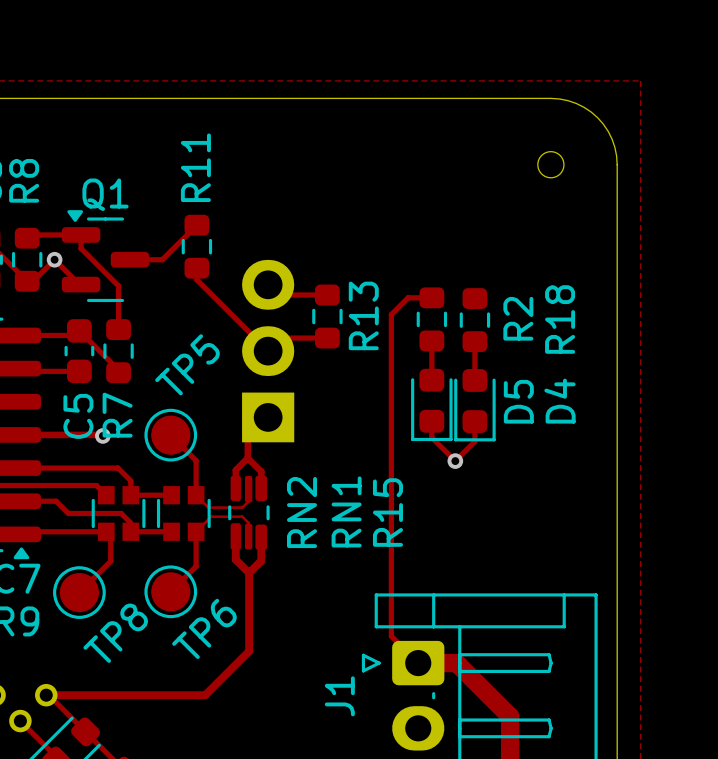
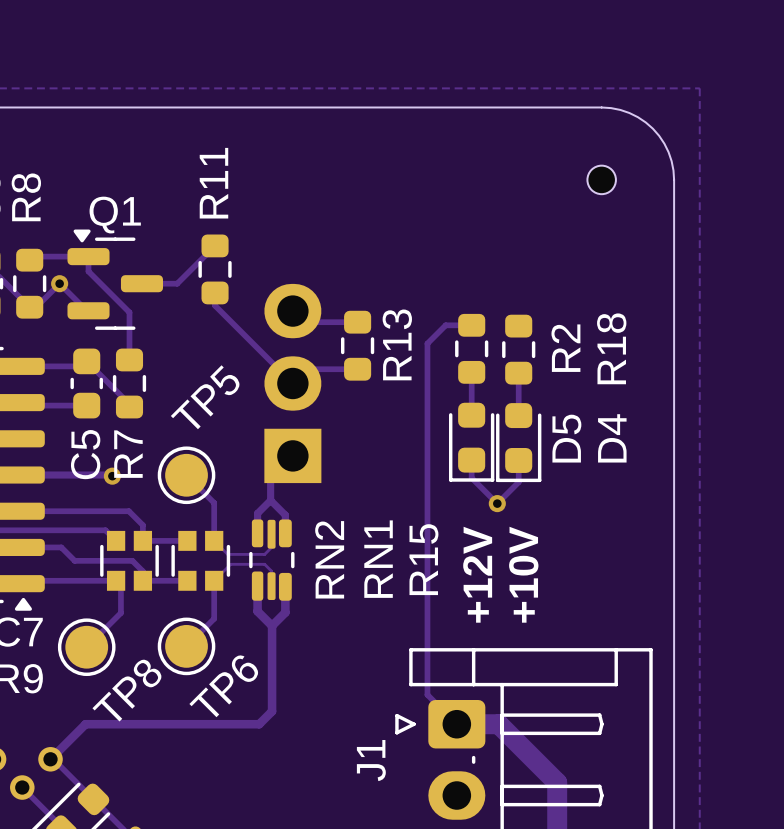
text: none -> +12V (477, 574)
text: none -> +10V (523, 574)
track: (237, 663) (205, 695) (46, 695) -> (259, 724) (85, 724) (50, 759)

